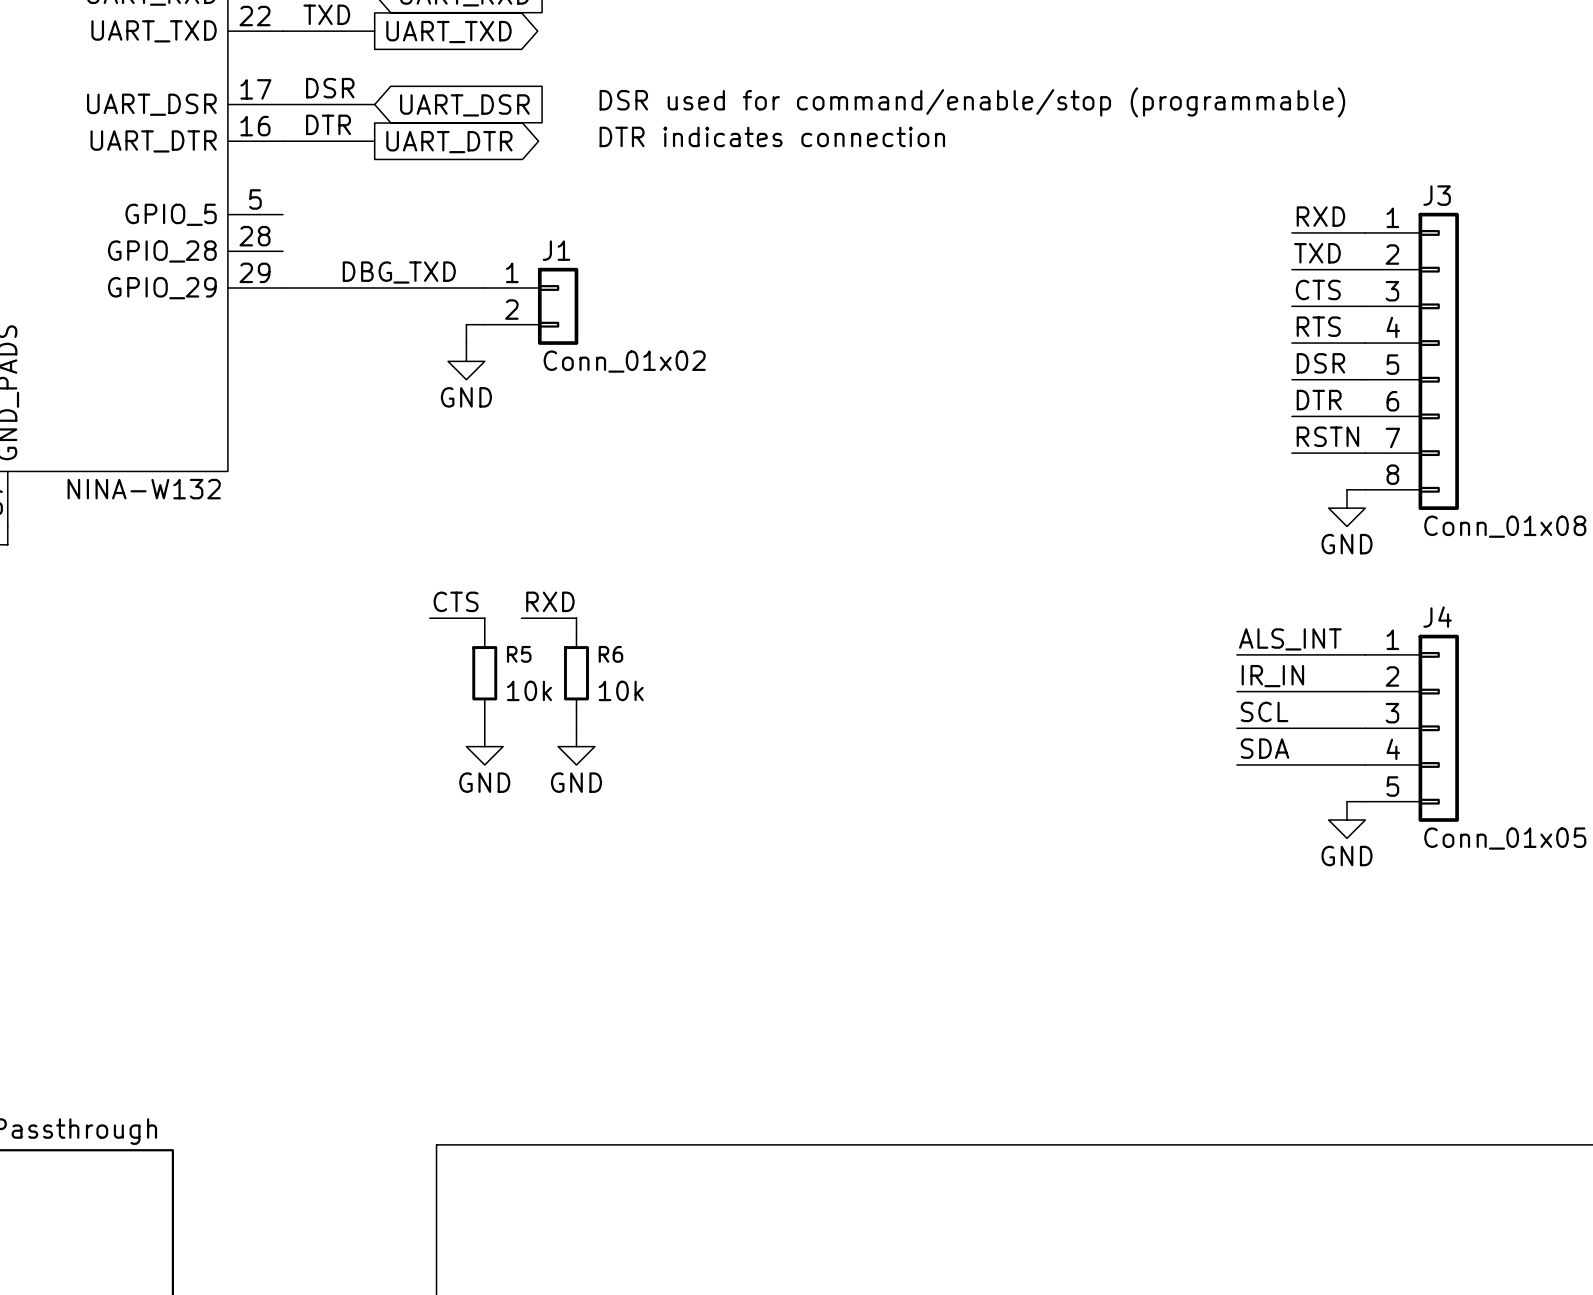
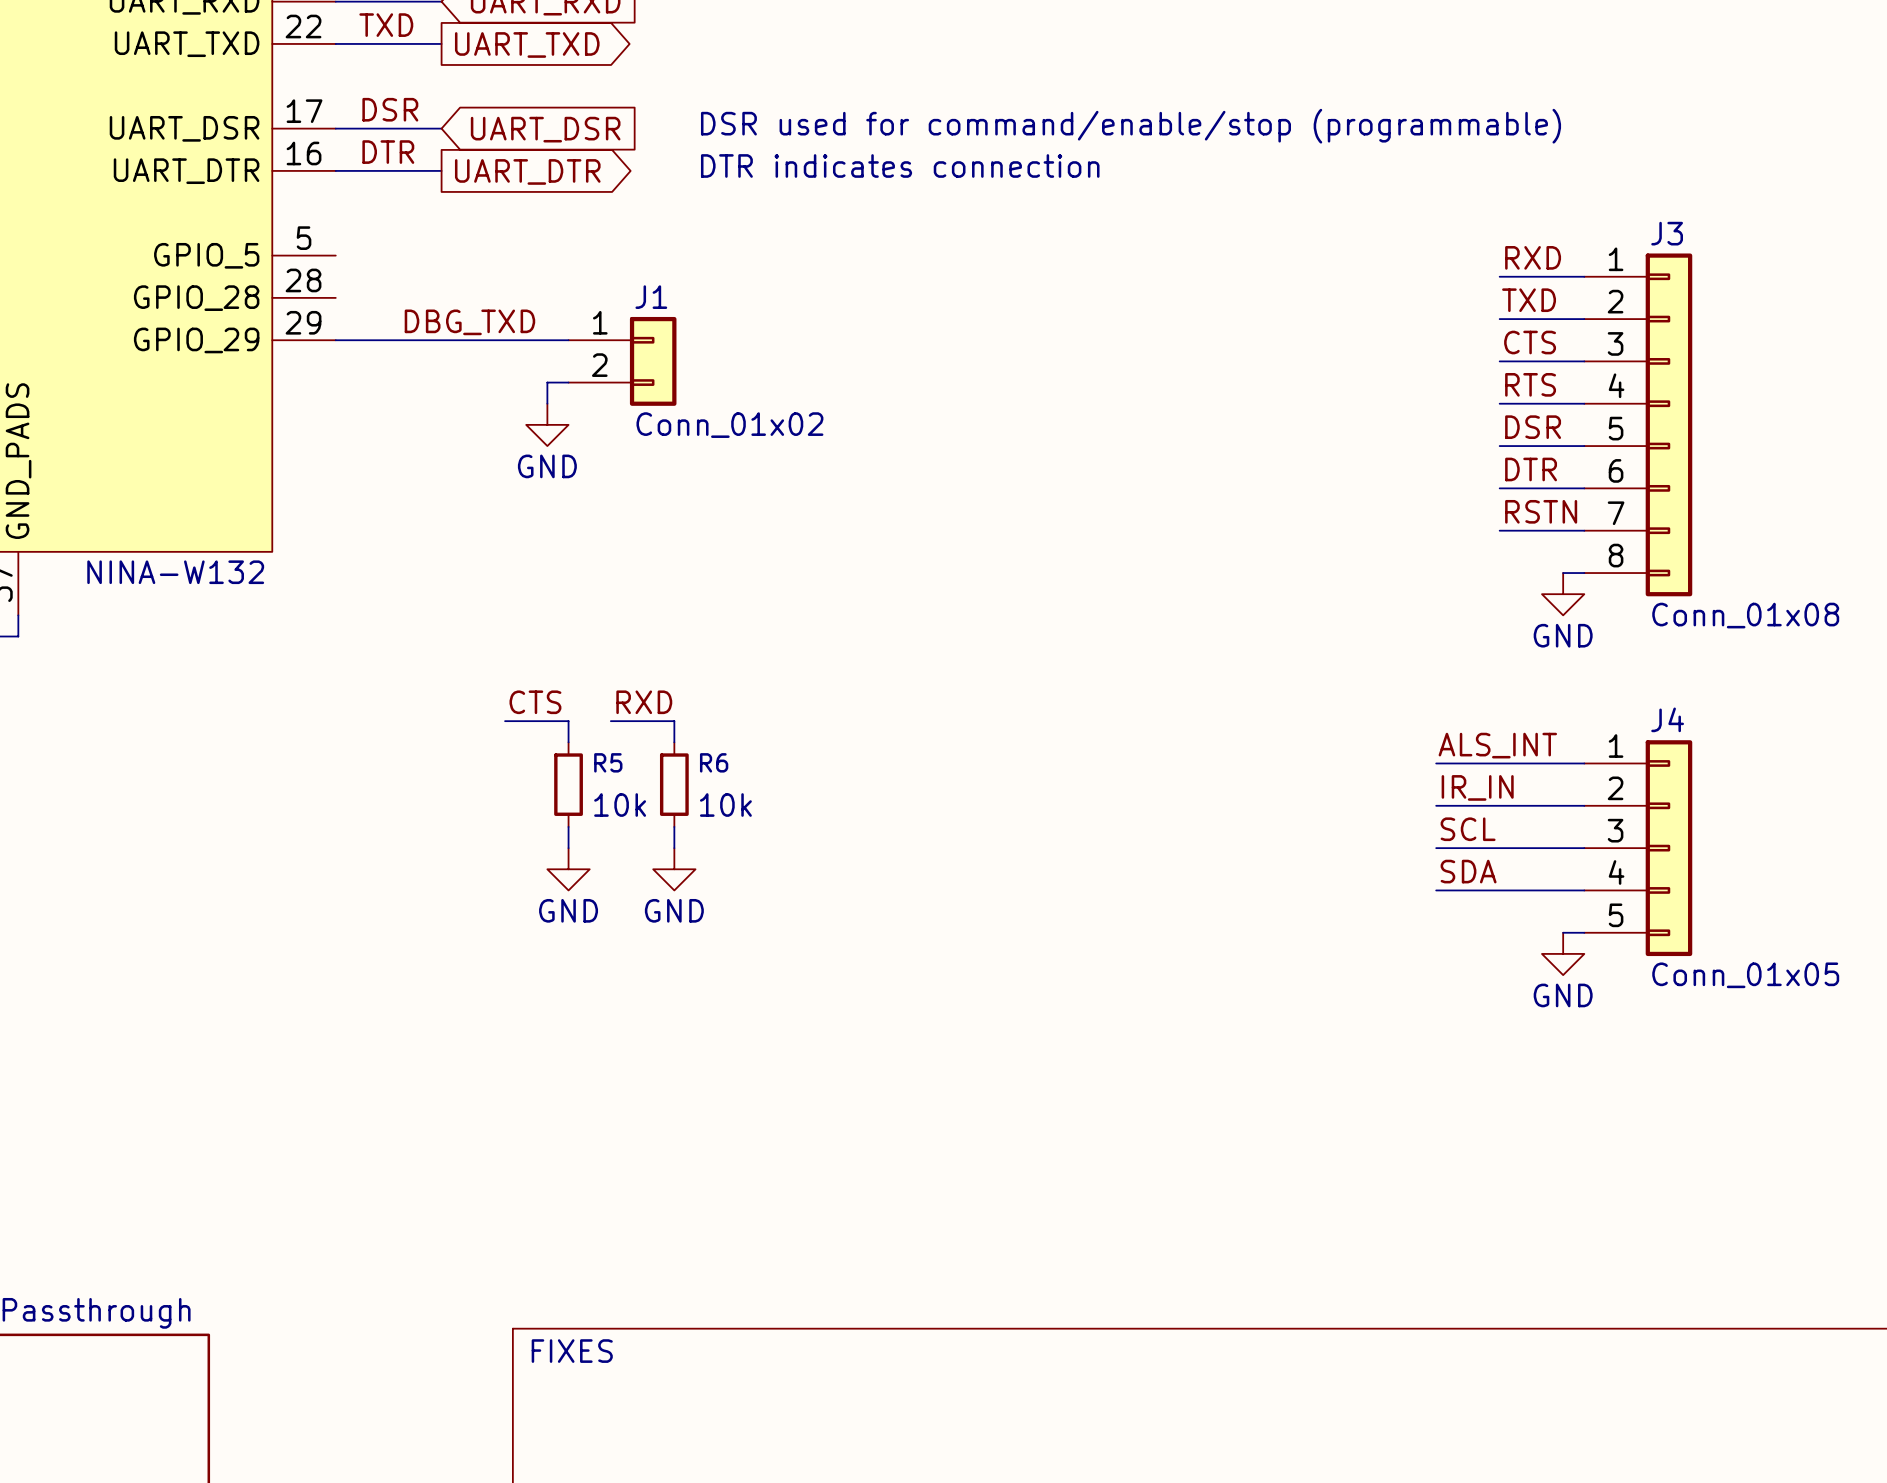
text: none -> FIXES (572, 1351)

